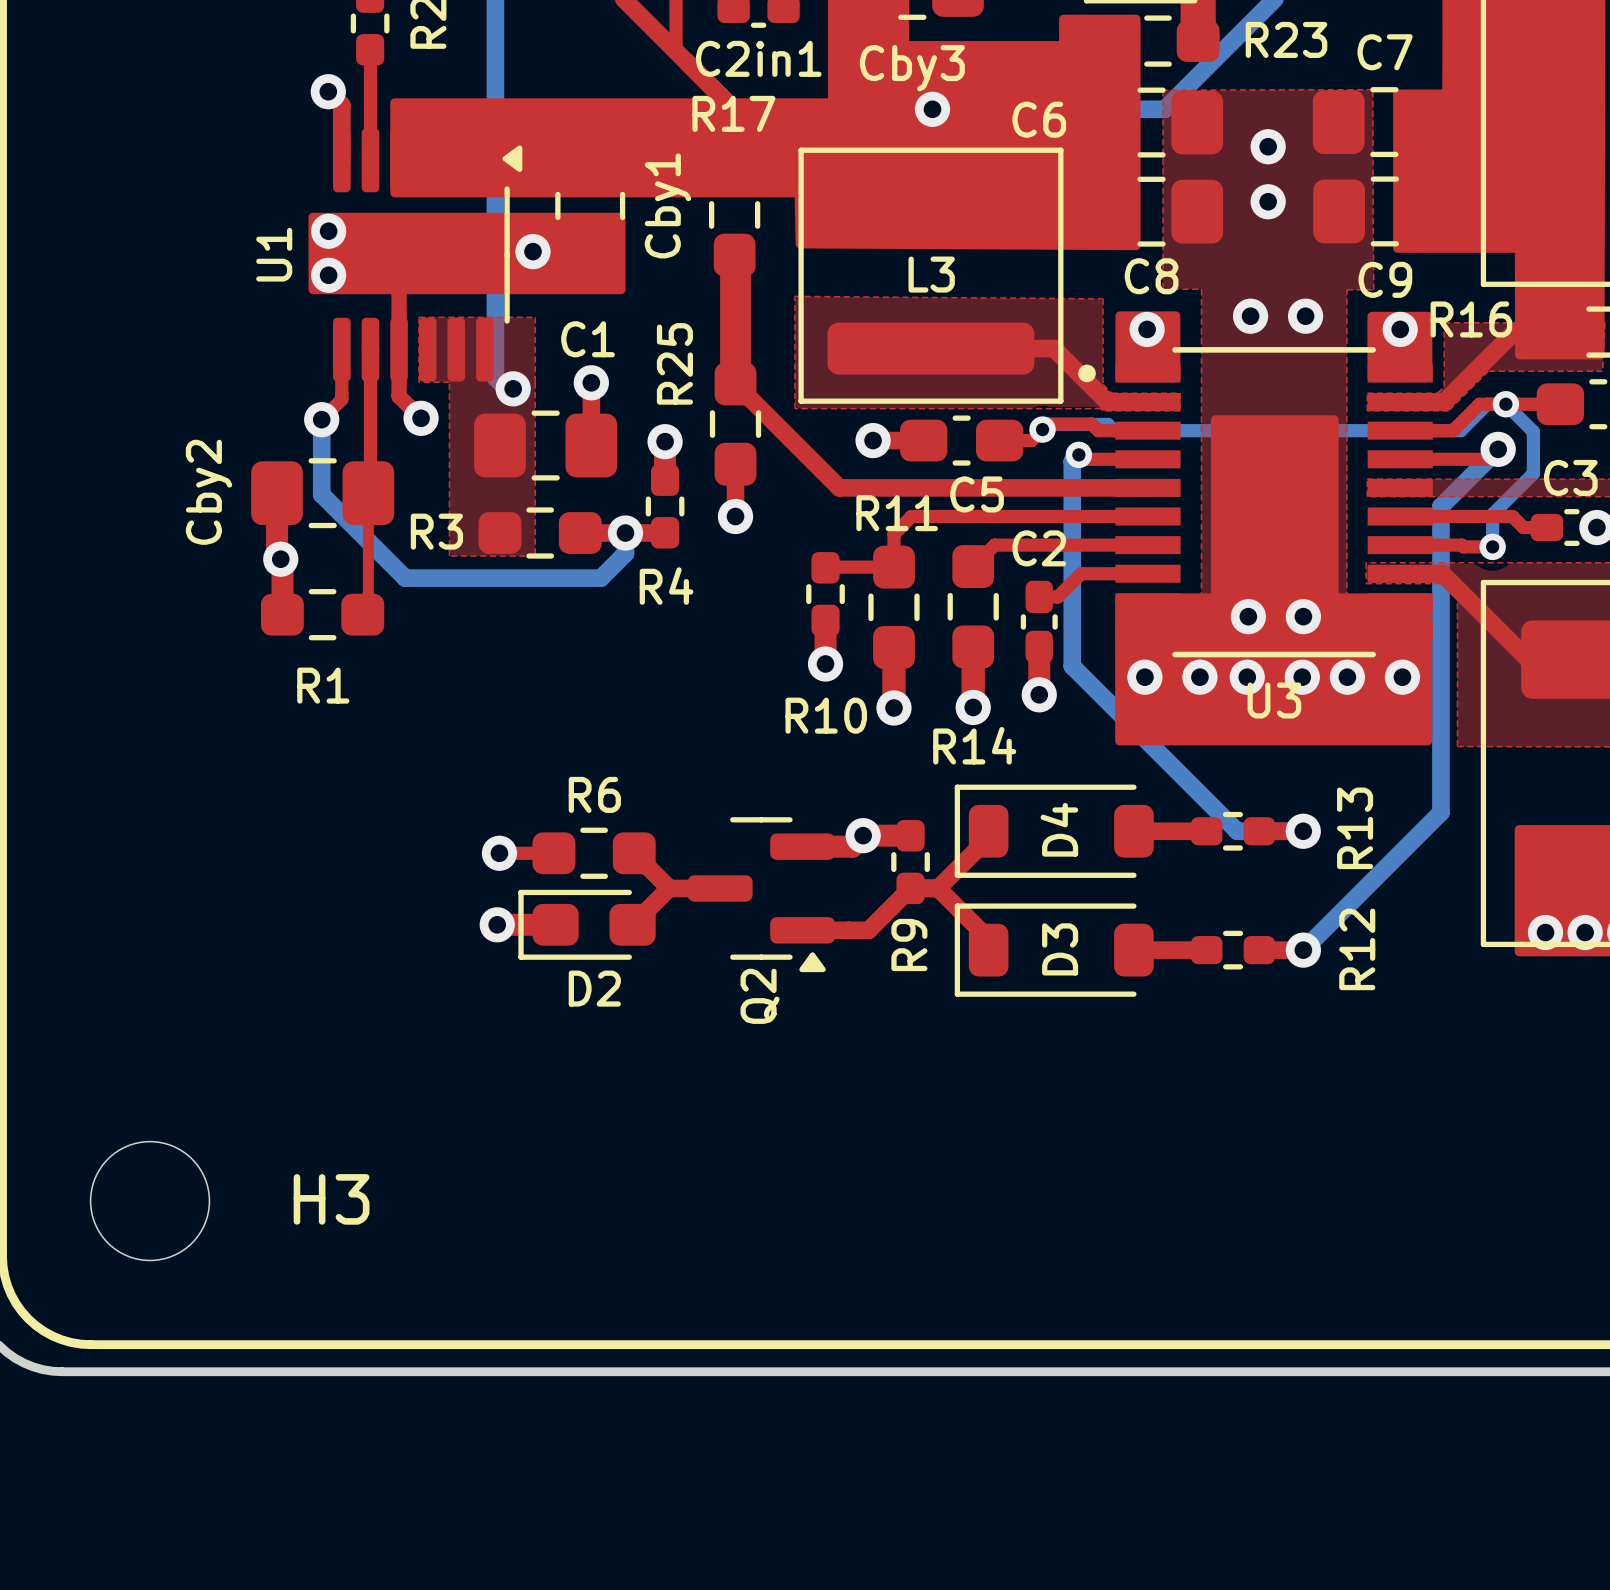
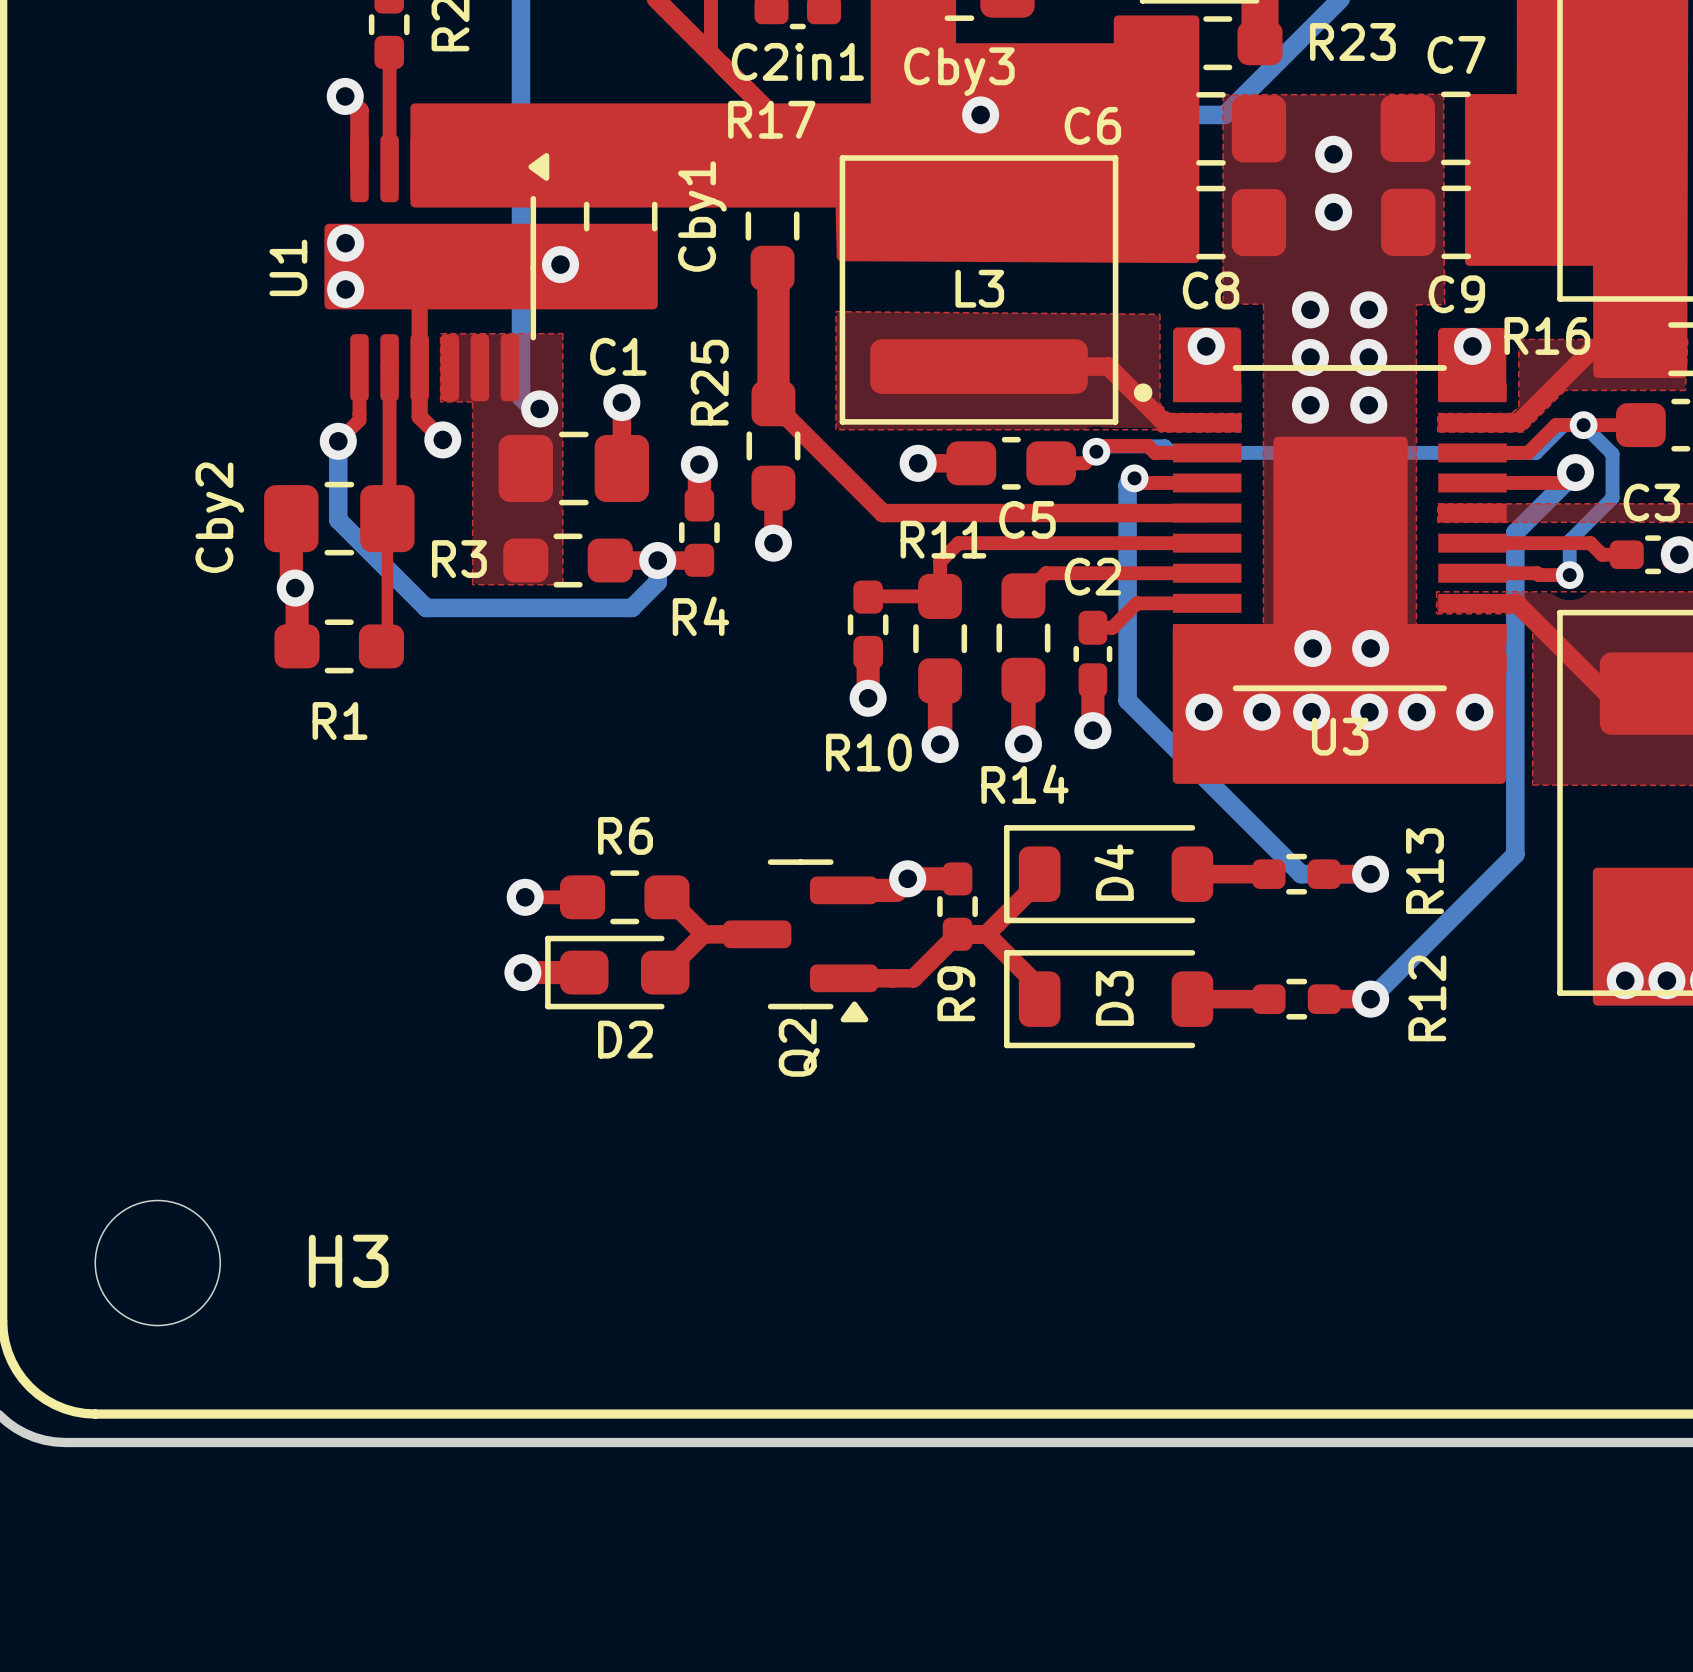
via: none -> (1310, 309)
via: none -> (1368, 309)
via: (1250, 316) -> none
via: (1305, 316) -> none
via: none -> (1310, 357)
via: none -> (1368, 357)
via: none -> (1310, 405)
via: none -> (1368, 405)

